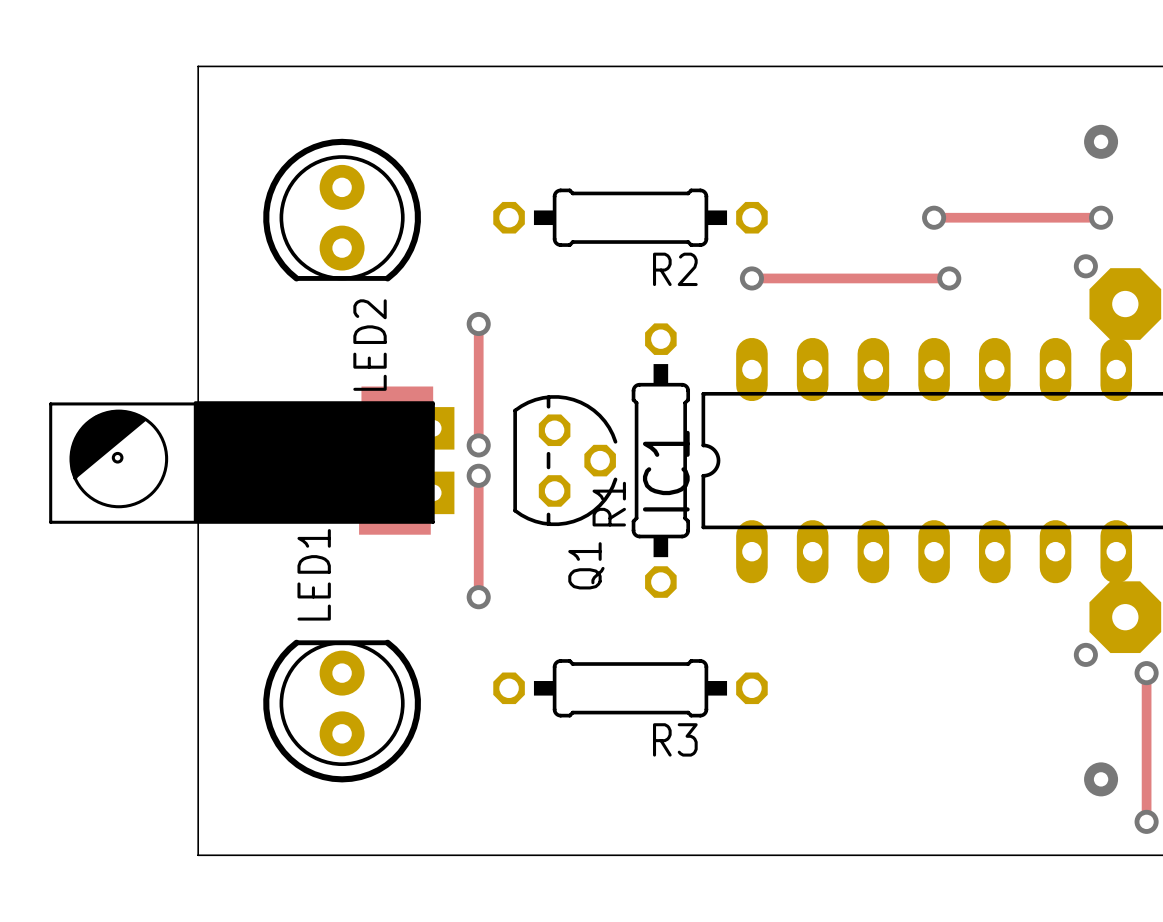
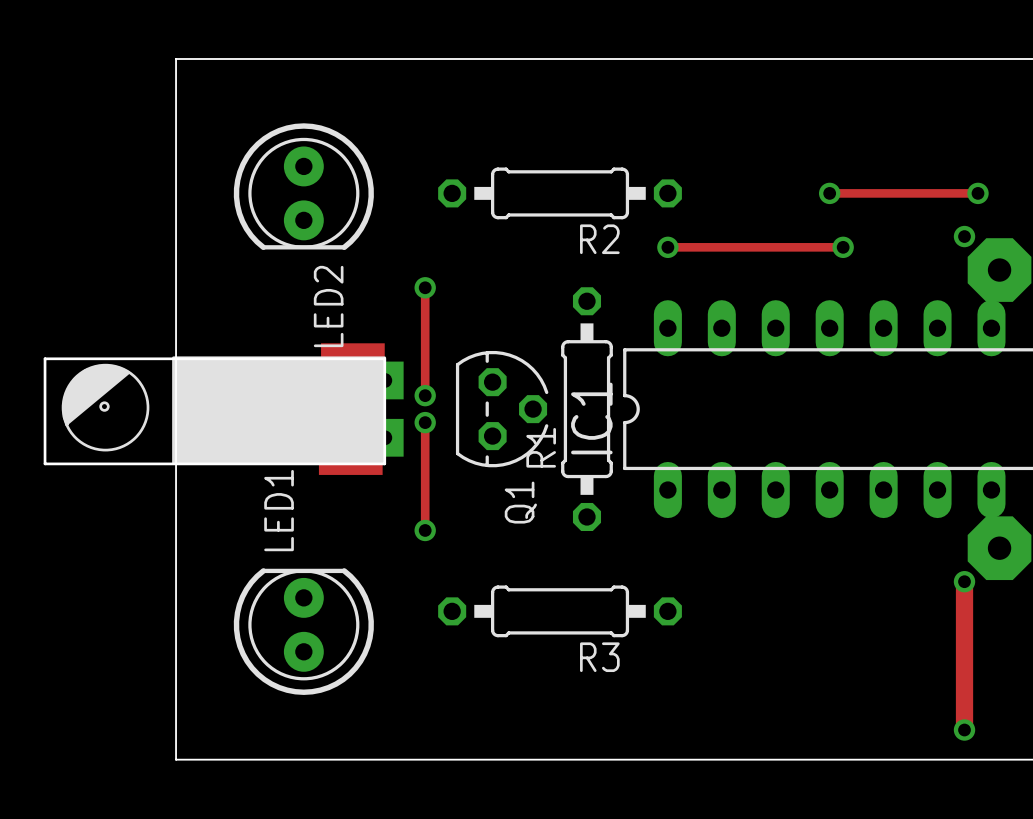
via: (1101, 141) -> none
track: none -> (964, 584) (964, 730)
track: (1146, 673) (1146, 821) -> none
via: (1146, 673) -> none
via: (1101, 779) -> none
via position: (1146, 821) -> (964, 730)

